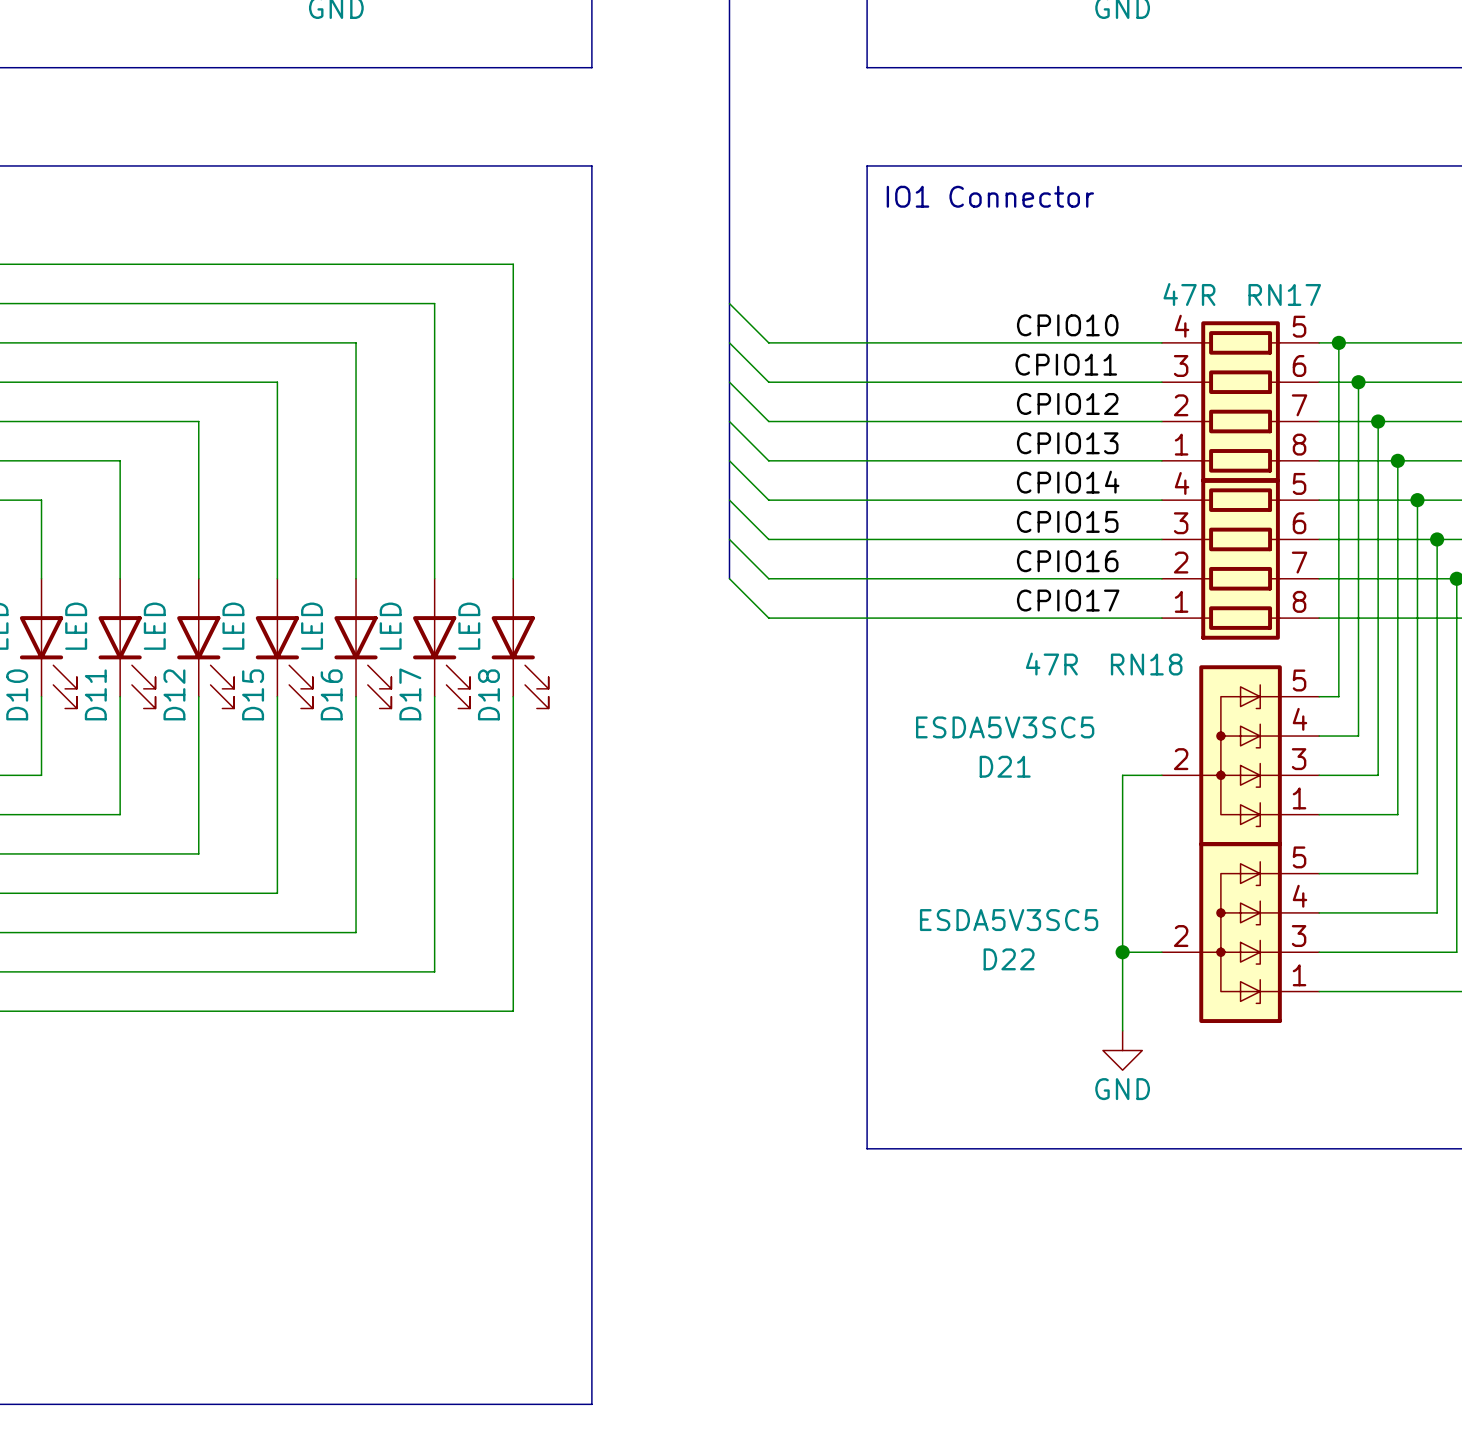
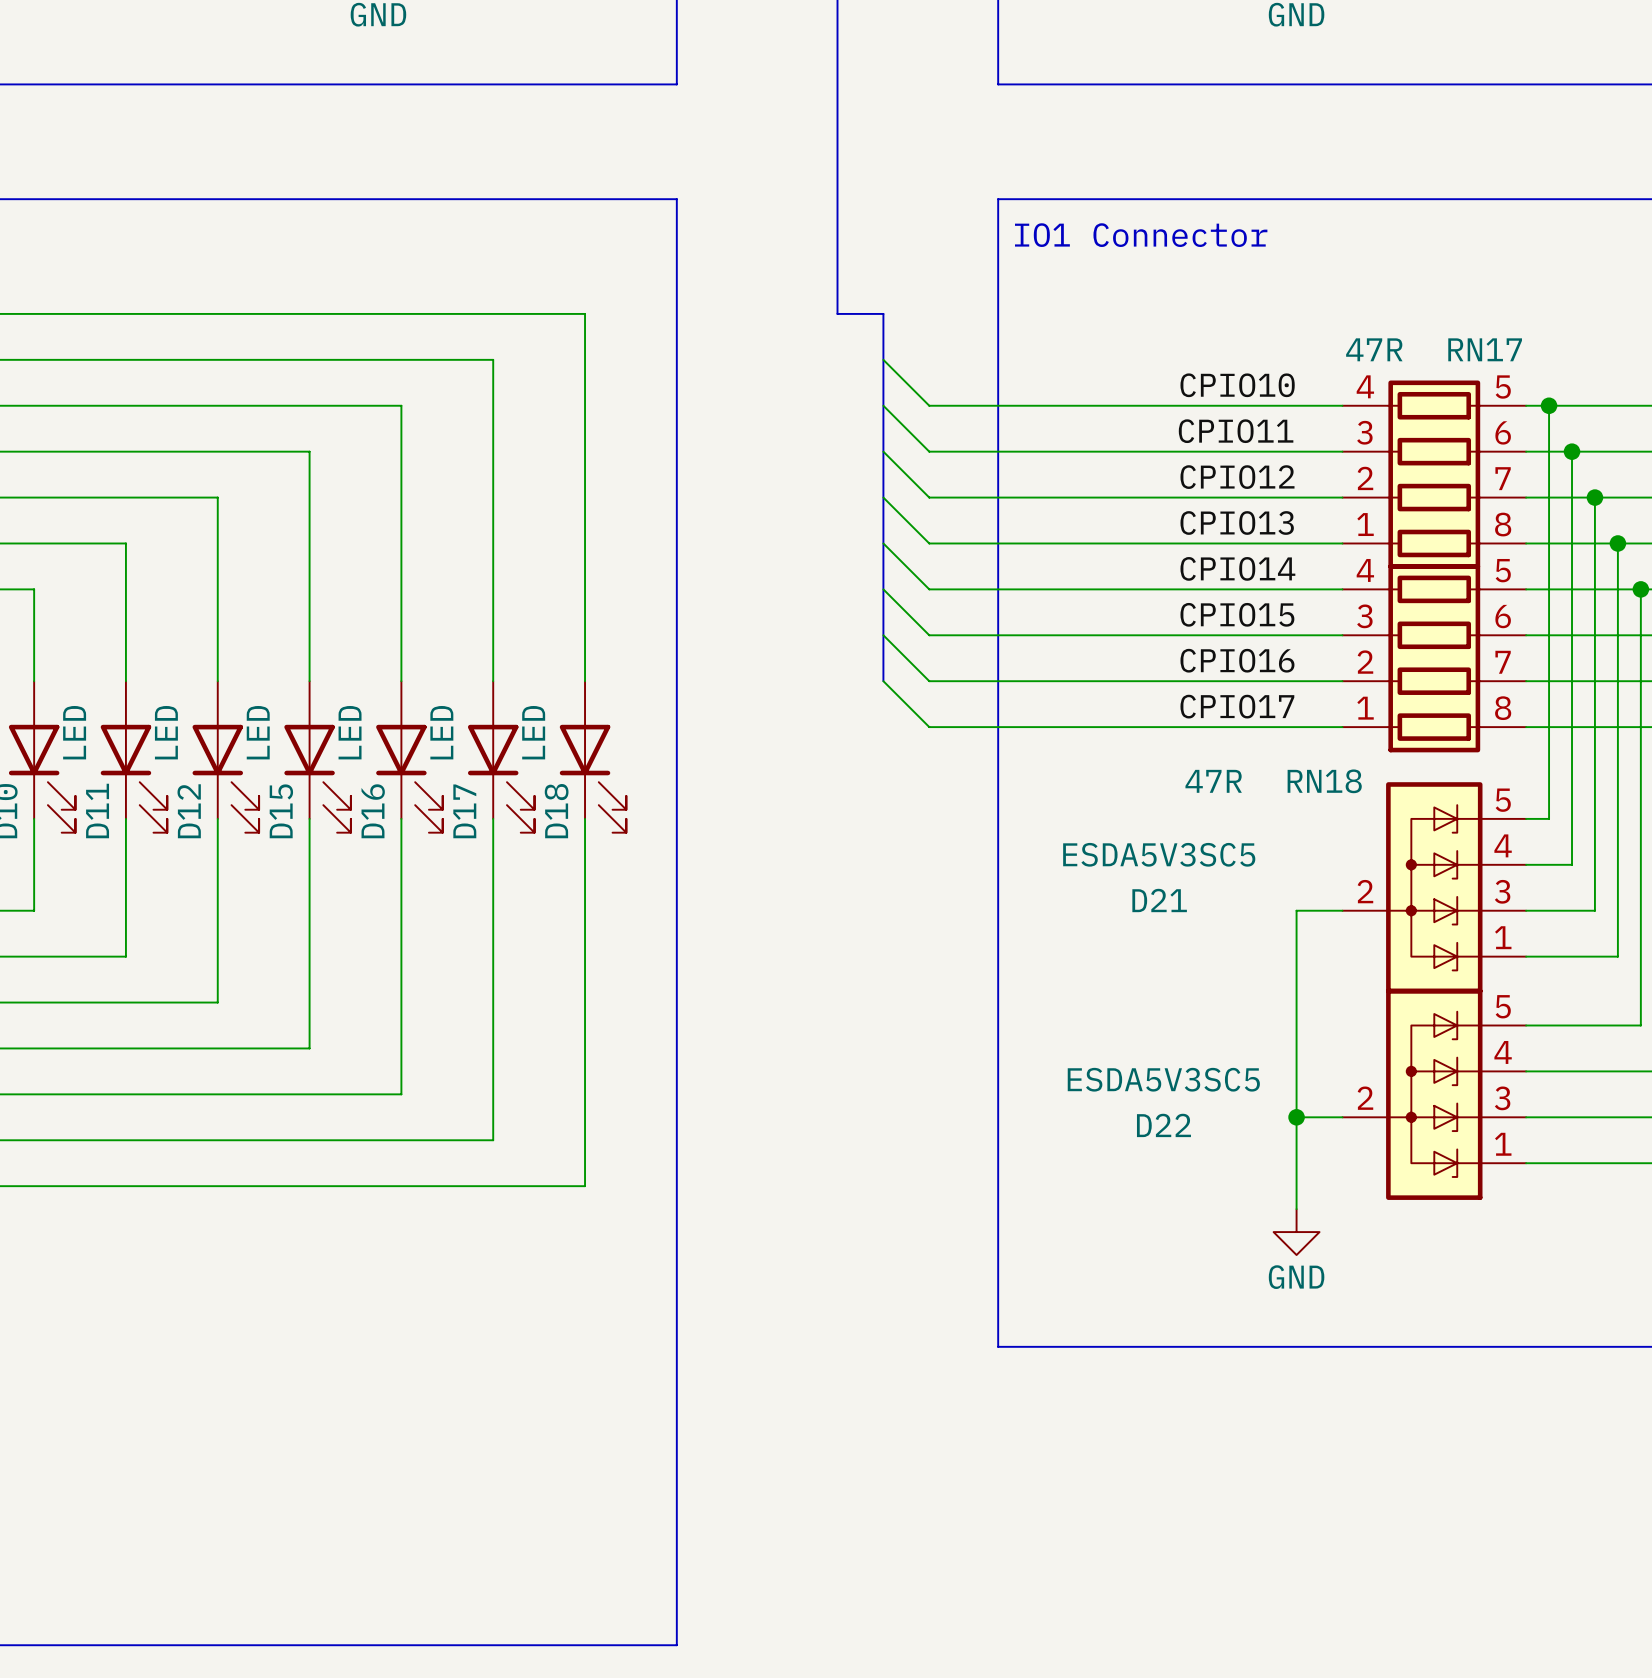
bus: (729, 264) (729, 578) -> (837, 313) (883, 313) (883, 681)
wire: (729, 303) (768, 342) (808, 342) -> (883, 359) (929, 405)
wire: (729, 342) (768, 382) (808, 382) -> (883, 405) (929, 451)
wire: (729, 382) (768, 421) (808, 421) -> (883, 451) (929, 497)
wire: (729, 421) (768, 460) (808, 460) -> (883, 497) (929, 543)
wire: (729, 460) (768, 500) (808, 500) -> (883, 543) (929, 589)
wire: (729, 500) (768, 539) (808, 539) -> (883, 589) (929, 635)
wire: (729, 539) (768, 578) (808, 578) -> (883, 635) (929, 681)
wire: (729, 578) (768, 618) (808, 618) -> (883, 681) (929, 727)

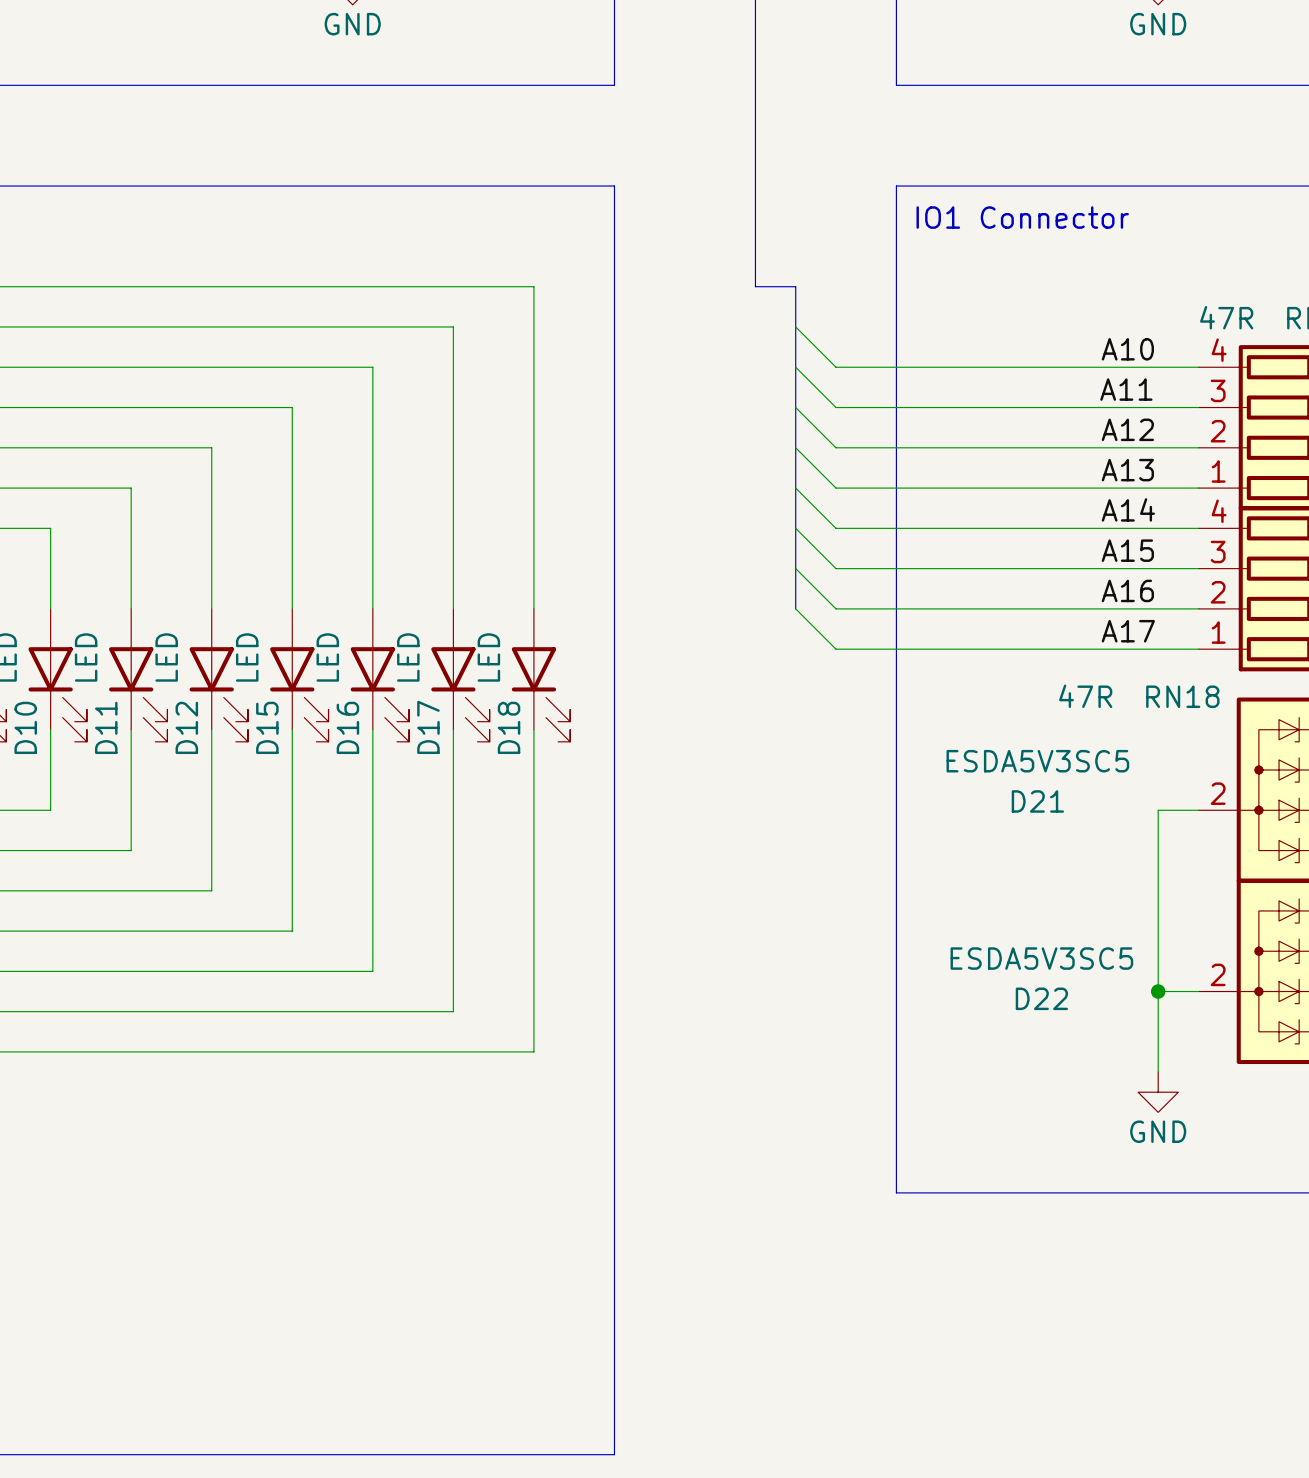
label: CPIO10 (1237, 385) -> A10 (1127, 349)
label: CPIO11 (1236, 431) -> A11 (1126, 389)
label: CPIO12 (1237, 477) -> A12 (1127, 429)
label: CPIO13 (1237, 522) -> A13 (1127, 470)
label: CPIO14 (1237, 568) -> A14 (1128, 509)
label: CPIO15 (1237, 614) -> A15 (1127, 550)
label: CPIO16 (1237, 660) -> A16 (1127, 590)
label: CPIO17 (1237, 706) -> A17 (1128, 631)

